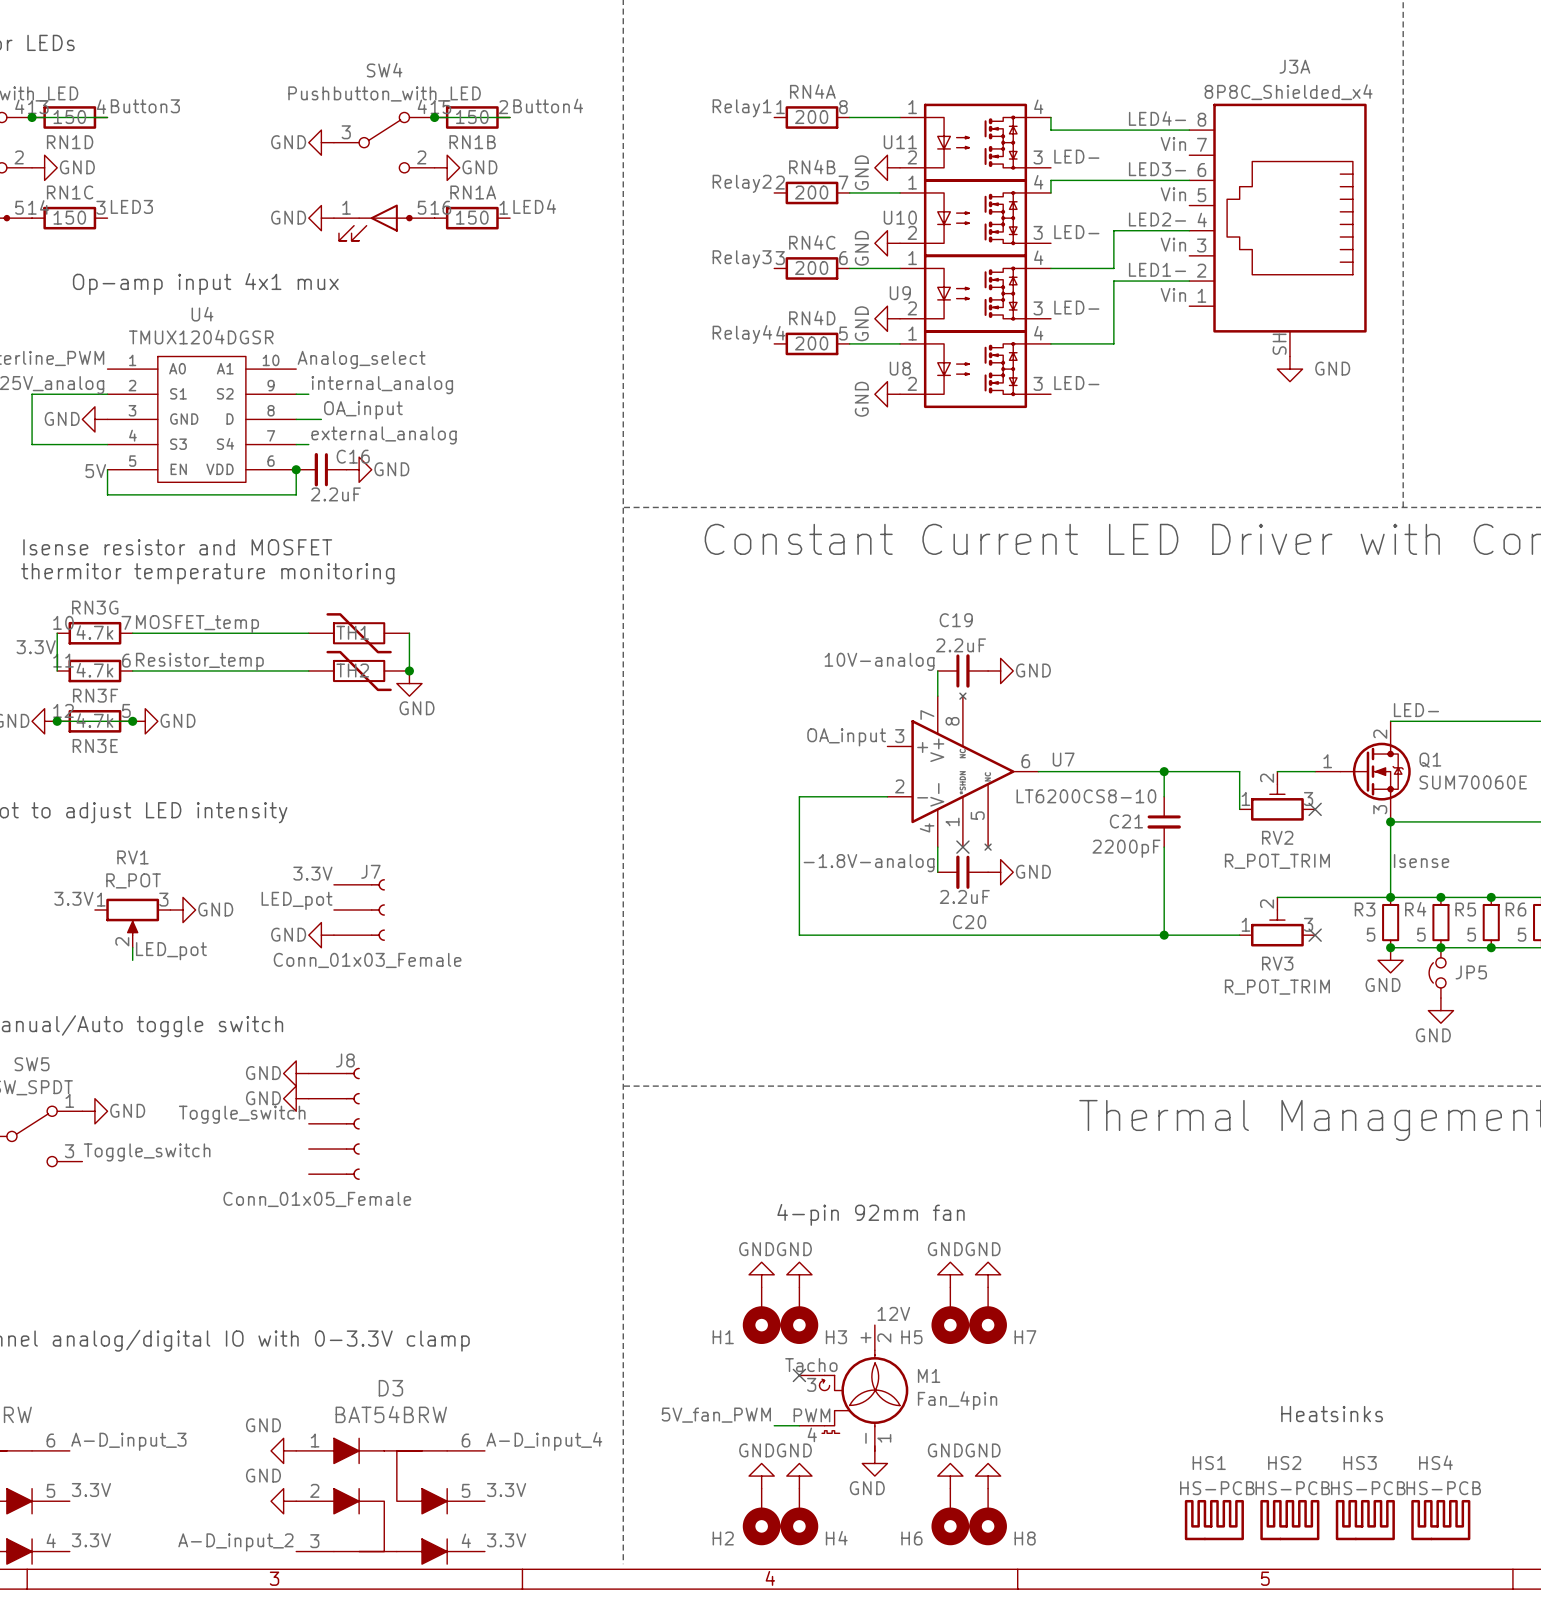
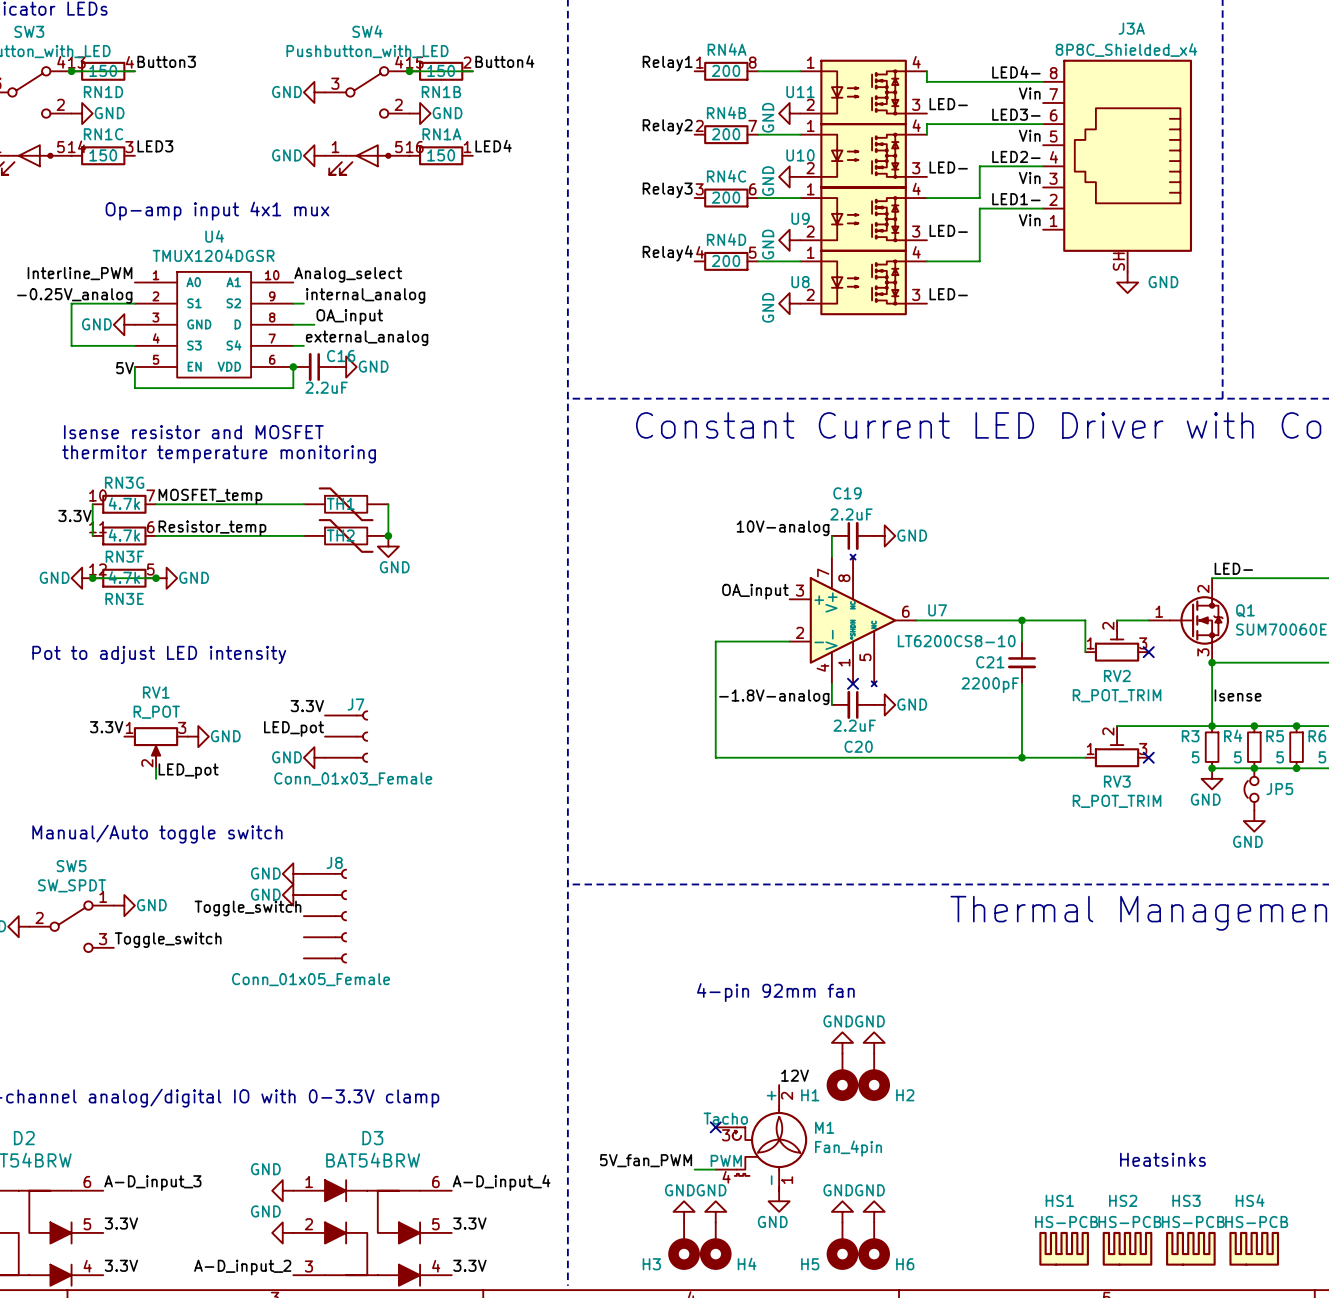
power symbol: GND (761, 1274) -> none
power symbol: GND (799, 1274) -> none
H1: (761, 1315) -> none
H3: (799, 1315) -> none
H5 name: H5 (911, 1337) -> H1 (810, 1095)
H7 name: H7 (1025, 1337) -> H2 (905, 1095)
H2 name: H2 (723, 1538) -> H3 (651, 1264)
H6 name: H6 (911, 1538) -> H5 (810, 1264)
H8 name: H8 (1025, 1538) -> H6 (905, 1264)

